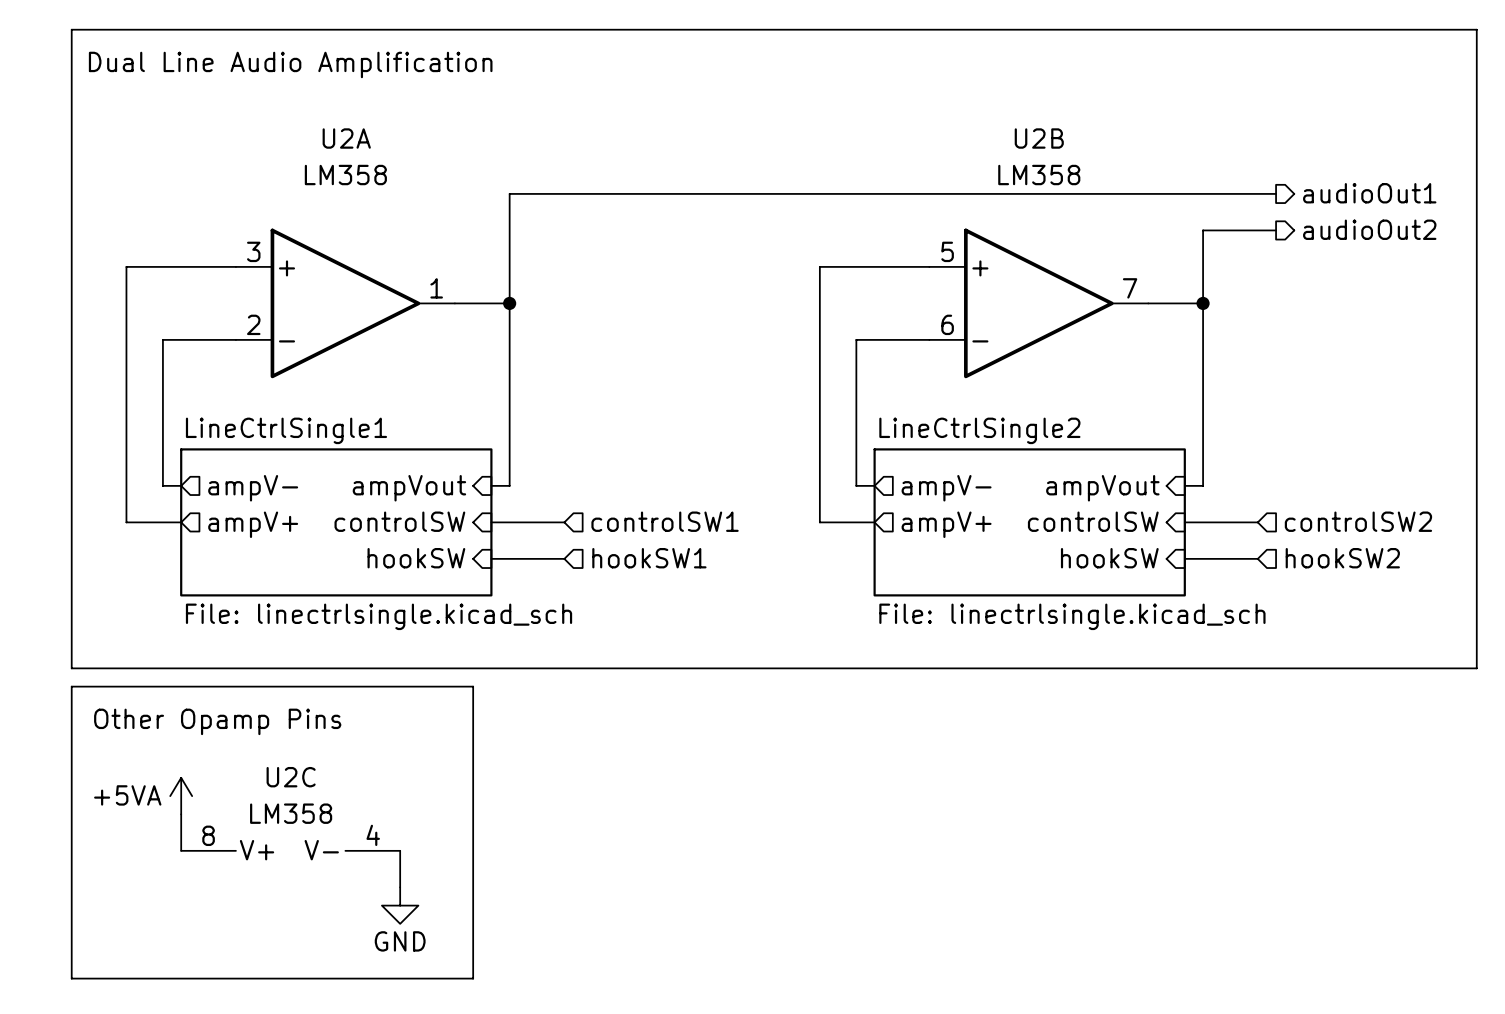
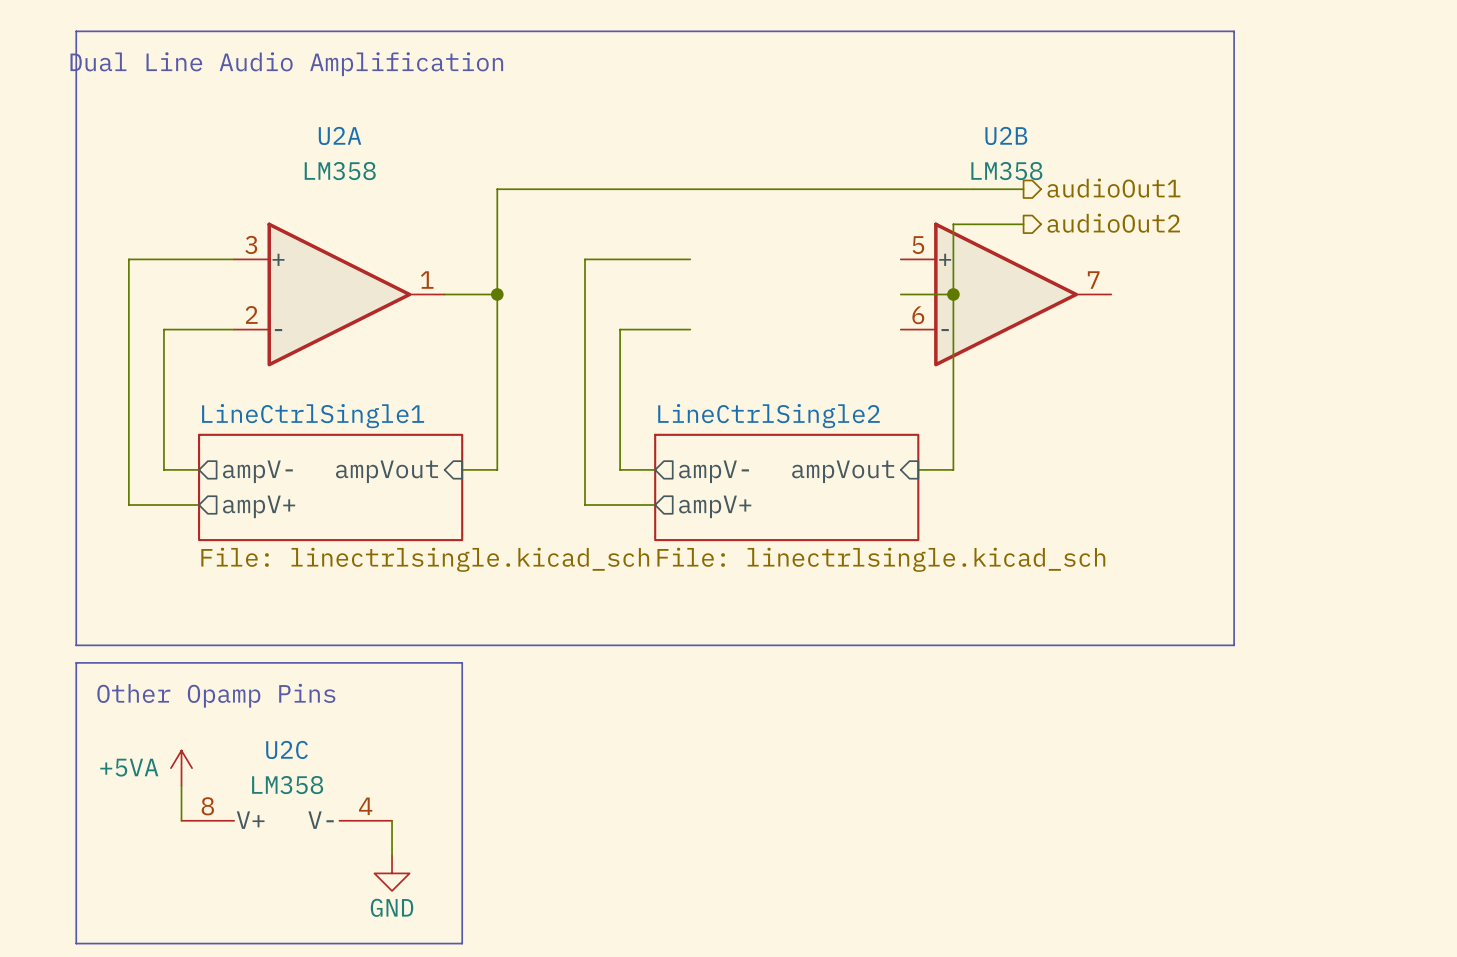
line: (1276, 29) (1476, 29) (1476, 668) (1276, 668) -> (1234, 31) (1234, 645)
wire: (1057, 193) (1276, 193) -> none
hierarchical label position: audioOut1 (1369, 193) -> audioOut1 (1113, 188)
hierarchical label position: audioOut2 (1369, 229) -> audioOut2 (1113, 223)
wire: none -> (1023, 224) (953, 224) (953, 469) (918, 469)
wire: (1276, 230) (1203, 230) (1203, 485) (1184, 485) -> none
wire: none -> (690, 259) (585, 259) (585, 505) (655, 505)
wire: (929, 266) (819, 266) (819, 522) (874, 522) -> none
junction: none -> (953, 294)
wire: (1148, 303) (1203, 303) -> (900, 294) (953, 294)
junction: (1203, 303) -> none
wire: none -> (690, 329) (620, 329) (620, 469) (655, 469)
wire: (929, 339) (856, 339) (856, 485) (874, 485) -> none
sheet LineCtrlSingle1 shape: [180, 448, 493, 597] -> [198, 433, 464, 542]
sheet LineCtrlSingle2 shape: [873, 448, 1186, 597] -> [654, 433, 920, 542]
wire: none -> (181, 469) (199, 469)
wire: none -> (462, 469) (479, 469)
sheet pin position: ampV- (253, 488) -> ampV- (257, 471)
sheet pin position: ampVout (409, 488) -> ampVout (387, 471)
sheet pin: none -> ampVout (843, 471)
sheet pin position: ampV- (946, 488) -> ampV- (714, 471)
sheet pin: ampVout (1102, 488) -> none
sheet pin: controlSW (399, 521) -> none
hierarchical label: controlSW1 (665, 521) -> none
sheet pin: controlSW (1093, 521) -> none
hierarchical label: controlSW2 (1358, 521) -> none
wire: none -> (181, 505) (199, 505)
wire: (491, 522) (564, 522) -> none
wire: (1184, 522) (1257, 522) -> none
sheet pin position: ampV+ (253, 524) -> ampV+ (259, 506)
sheet pin position: ampV+ (946, 524) -> ampV+ (715, 506)
sheet pin: hookSW (416, 558) -> none
wire: (491, 558) (564, 558) -> none
hierarchical label: hookSW1 (649, 558) -> none
sheet pin: hookSW (1109, 558) -> none
wire: (1184, 558) (1257, 558) -> none
hierarchical label: hookSW2 (1342, 558) -> none

